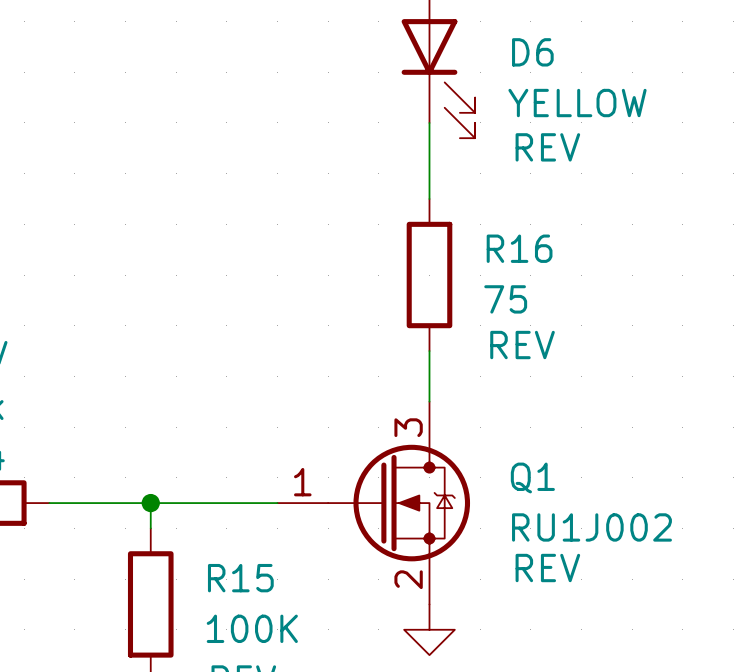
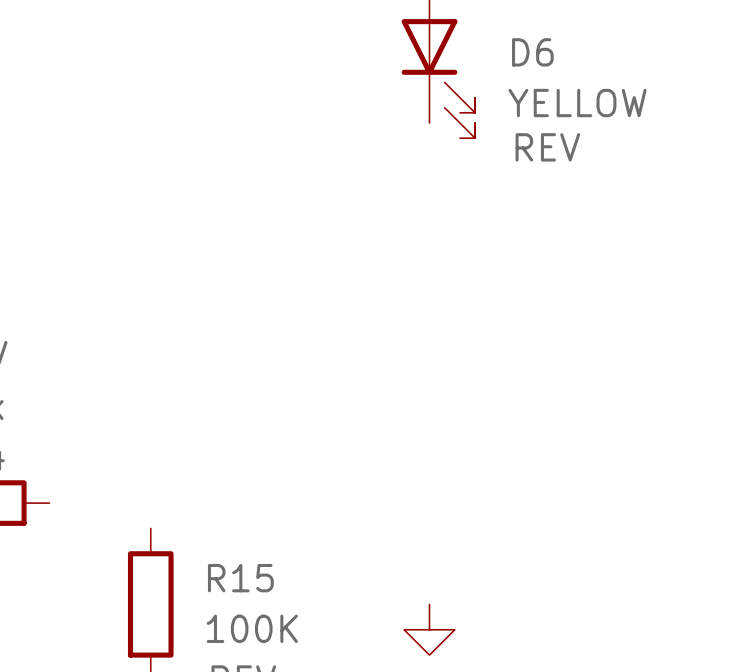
wire: (429, 122) (429, 198) -> none
R16: 75 (429, 275) -> none
wire: (429, 351) (429, 401) -> none
wire: (49, 503) (277, 503) -> none
wire: (150, 503) (150, 528) -> none
junction: (150, 503) -> none
Q1: RU1J002 (373, 503) -> none

